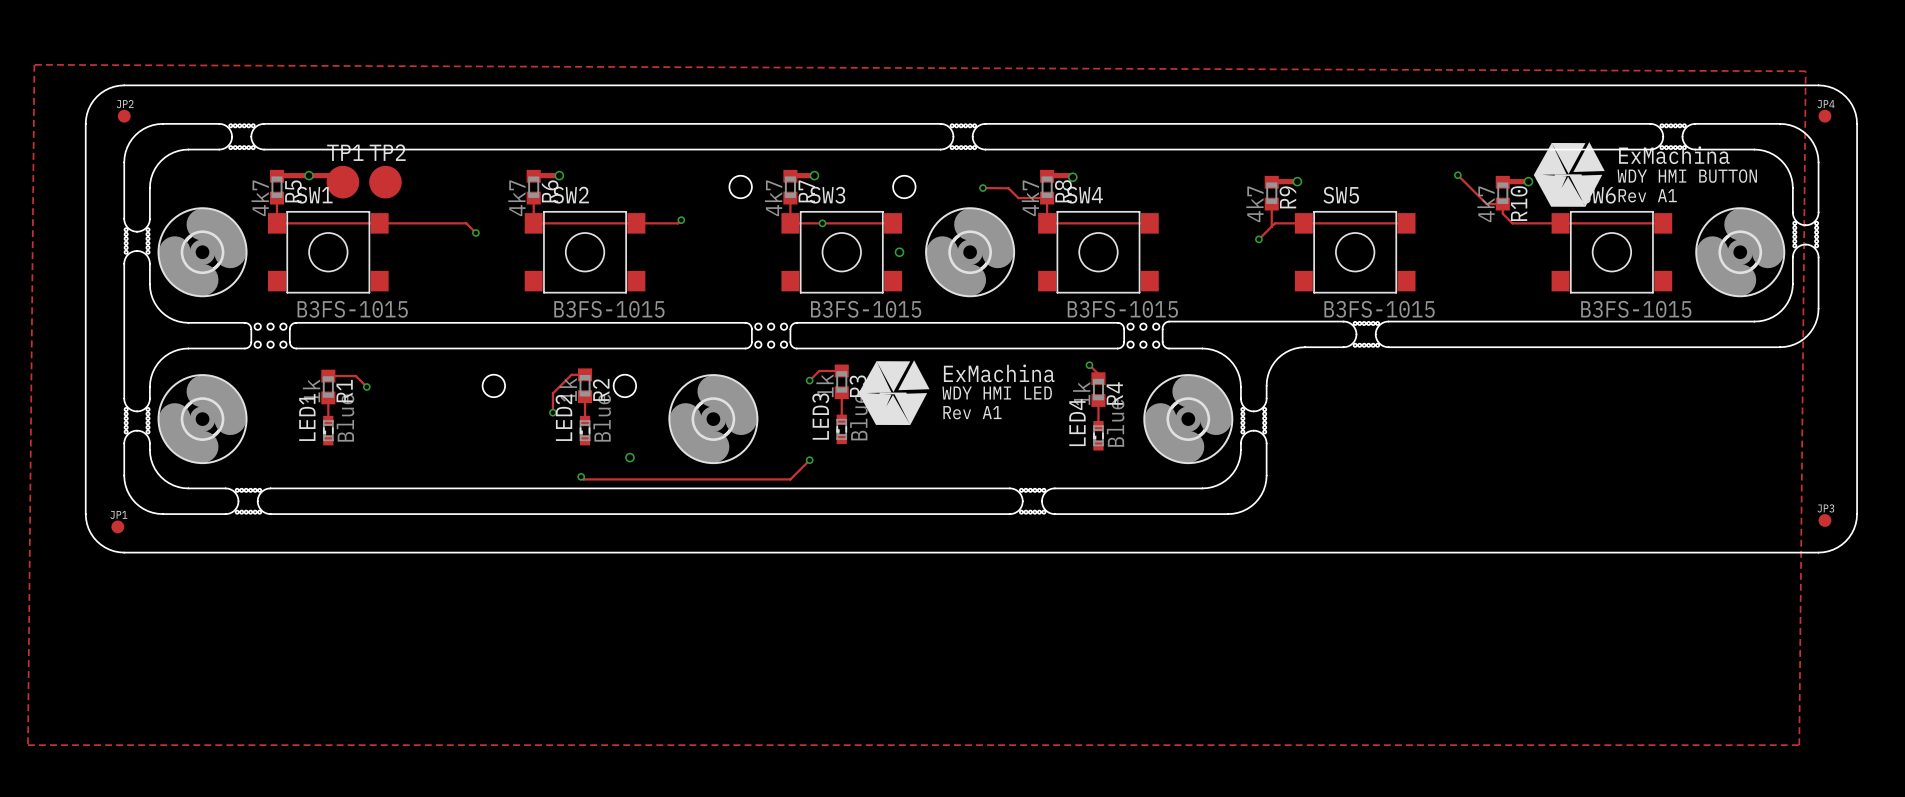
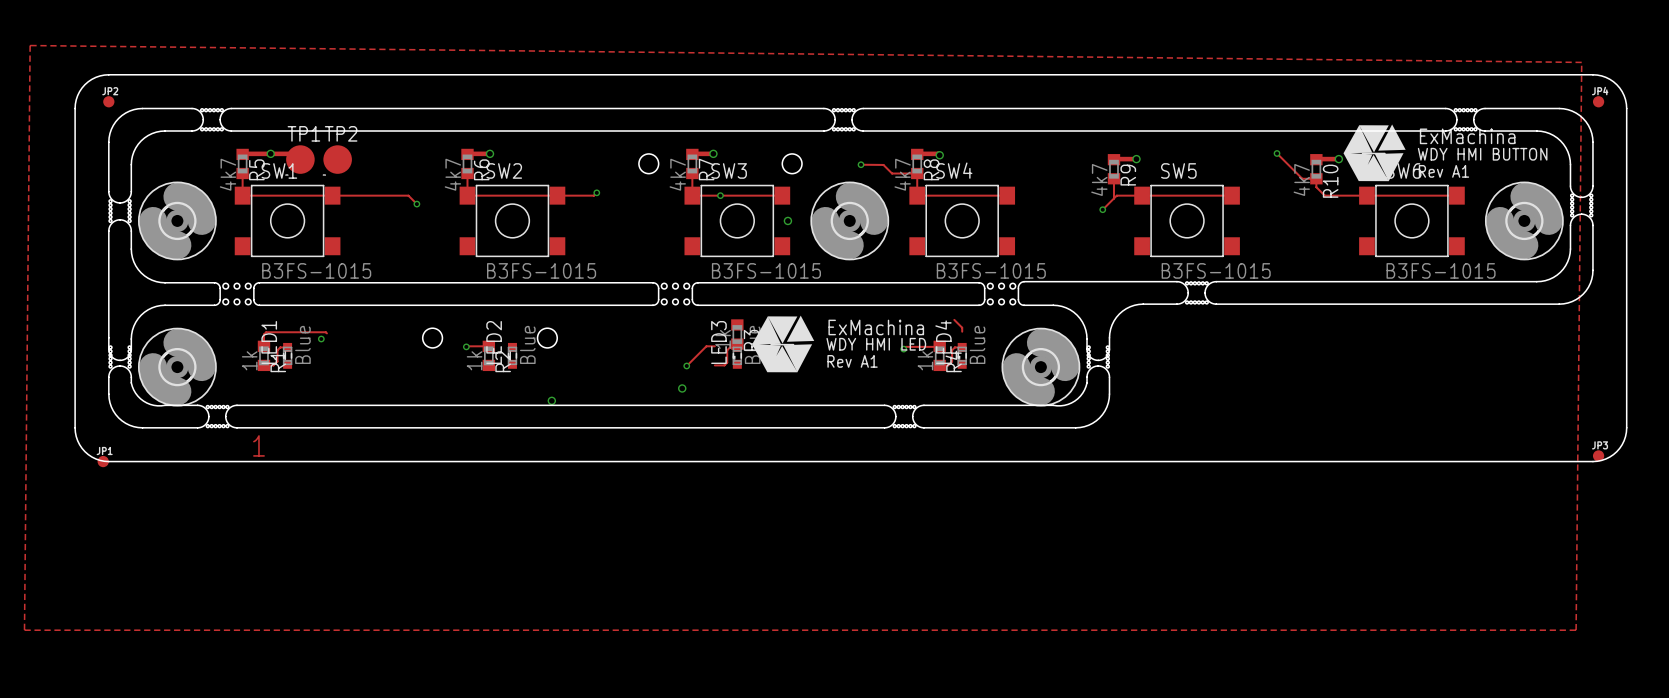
zone outline: (34, 64) (1805, 71) (1799, 745) (27, 745) (34, 64) -> (30, 45) (24, 630) (1576, 630) (1581, 62) (30, 45)
via position: (1089, 365) -> (903, 349)
track: (841, 370) (819, 370) (809, 380) -> none
track: (585, 374) (571, 374) (552, 393) (552, 412) -> none
track: (328, 376) (355, 376) (366, 387) -> none
track: none -> (326, 333) (266, 332) (263, 334) (263, 346)
via: (809, 380) -> none
R2 position: (585, 385) -> (488, 355)
R1 position: (328, 387) -> (263, 355)
R4 position: (1098, 389) -> (939, 355)
track: none -> (939, 342) (939, 346) (905, 346) (903, 349)
track: (841, 392) (841, 419) -> none
track: none -> (488, 346) (466, 346)
track: none -> (714, 346) (706, 346) (686, 365)
hole: none -> (110, 347)
hole: none -> (129, 347)
track: none -> (287, 347) (280, 347) (277, 350) (277, 361) (273, 365) (263, 365)
track: (585, 396) (585, 421) -> none
track: none -> (737, 347) (730, 347) (727, 350) (727, 362) (724, 365) (714, 365)
track: none -> (962, 347) (954, 347) (952, 350) (952, 361) (948, 365) (939, 365)
hole: none -> (1088, 347)
hole: none -> (1107, 347)
track: (328, 397) (328, 421) -> none
track: (1098, 400) (1098, 426) -> none
hole: none -> (110, 351)
hole: none -> (129, 351)
hole: none -> (1088, 351)
hole: none -> (1107, 351)
hole: none -> (110, 355)
hole: none -> (129, 355)
hole: none -> (1088, 355)
hole: none -> (1107, 355)
via position: (552, 412) -> (466, 346)
via: none -> (686, 365)
part: (713, 419) -> none
hole: (126, 422) -> none
hole: (147, 422) -> none
hole: (1242, 422) -> none
hole: (1264, 422) -> none
hole: (126, 427) -> none
hole: (147, 427) -> none
hole: (1242, 427) -> none
hole: (1264, 427) -> none
LED3 position: (841, 429) -> (737, 355)
LED1 position: (328, 430) -> (287, 355)
LED2 position: (585, 430) -> (512, 355)
hole: (126, 431) -> none
hole: (147, 431) -> none
hole: (1242, 431) -> none
hole: (1264, 431) -> none
LED4 position: (1098, 435) -> (962, 355)
board edge: (124, 443) (126, 435) (132, 431) (138, 430) (144, 433) (149, 440) (151, 459) (157, 473) (169, 483) (188, 488) -> (108, 394) (113, 410) (125, 423) (138, 427) (165, 427)
via: none -> (682, 388)
board edge: (1266, 443) (1263, 435) (1258, 431) (1252, 430) (1245, 433) (1241, 440) (1239, 459) (1232, 473) (1221, 483) (1202, 488) -> (1109, 394) (1104, 410) (1092, 423) (1080, 427) (1053, 427)
board edge: (124, 449) (124, 480) (127, 490) (135, 502) (148, 511) (162, 514) (228, 513) (235, 509) (238, 499) (233, 491) (225, 488) -> (108, 388) (108, 375) (111, 370) (117, 366) (124, 366) (130, 372) (131, 382) (135, 393) (146, 402) (157, 405) (197, 405) (204, 407) (208, 413) (208, 420) (204, 425) (197, 427)
board edge: (1266, 449) (1266, 480) (1261, 494) (1251, 506) (1233, 513) (1053, 513) (1044, 509) (1041, 501) (1045, 492) (1054, 488) -> (1109, 388) (1107, 371) (1102, 366) (1095, 366) (1087, 372) (1087, 382) (1082, 393) (1068, 404) (922, 405) (915, 409) (912, 416) (916, 424) (923, 427)
track: (809, 460) (790, 479) (583, 479) (581, 476) -> none
via: (809, 460) -> none
hole: none -> (207, 407)
hole: none -> (211, 407)
hole: none -> (215, 407)
hole: none -> (219, 407)
hole: none -> (223, 407)
hole: none -> (227, 407)
hole: none -> (894, 407)
hole: none -> (898, 407)
hole: none -> (902, 407)
hole: none -> (906, 407)
hole: none -> (910, 407)
hole: none -> (914, 407)
via: (581, 476) -> none
hole: none -> (207, 426)
hole: none -> (211, 426)
hole: none -> (215, 426)
hole: none -> (219, 426)
hole: none -> (223, 426)
hole: none -> (227, 426)
hole: none -> (894, 426)
hole: none -> (898, 426)
hole: none -> (902, 426)
hole: none -> (906, 426)
hole: none -> (910, 426)
hole: none -> (914, 426)
board edge: (85, 488) (86, 519) (90, 533) (104, 547) (124, 552) (1818, 552) (1837, 547) (1851, 533) (1856, 519) (1857, 488) -> (75, 427) (77, 440) (84, 451) (95, 458) (108, 461) (1592, 461) (1605, 458) (1616, 451) (1624, 440) (1626, 427)
board edge: (270, 488) (261, 492) (257, 501) (261, 510) (270, 514) (1009, 514) (1018, 510) (1022, 501) (1018, 492) (1009, 488) -> (237, 427) (229, 424) (225, 416) (229, 408) (237, 405) (884, 405) (892, 408) (895, 416) (892, 424) (884, 427)
hole: (237, 490) -> none
hole: (241, 490) -> none
hole: (246, 490) -> none
hole: (250, 490) -> none
hole: (255, 490) -> none
hole: (259, 490) -> none
hole: (1021, 490) -> none
hole: (1025, 490) -> none
hole: (1030, 490) -> none
hole: (1034, 490) -> none
hole: (1039, 490) -> none
hole: (1043, 490) -> none
text: none -> 1 (258, 445)
hole: (237, 512) -> none
hole: (241, 512) -> none
hole: (246, 512) -> none
hole: (250, 512) -> none
hole: (255, 512) -> none
hole: (259, 512) -> none
hole: (1021, 512) -> none
hole: (1025, 512) -> none
hole: (1030, 512) -> none
hole: (1034, 512) -> none
hole: (1039, 512) -> none
hole: (1043, 512) -> none

